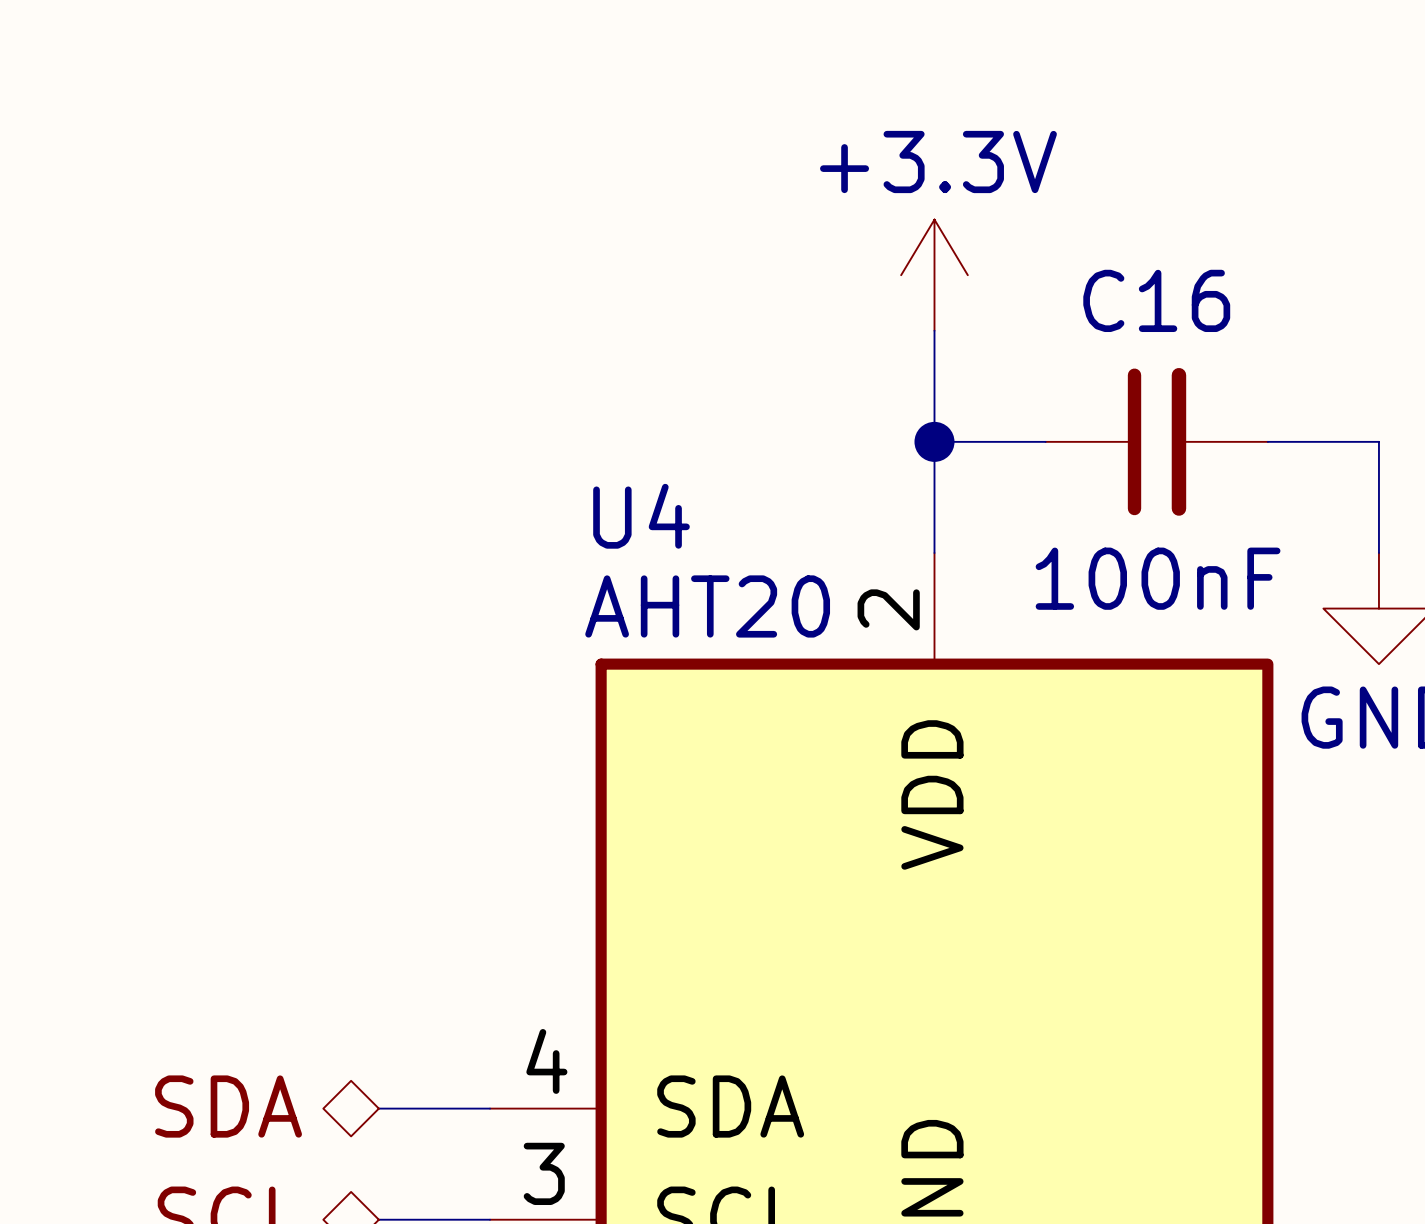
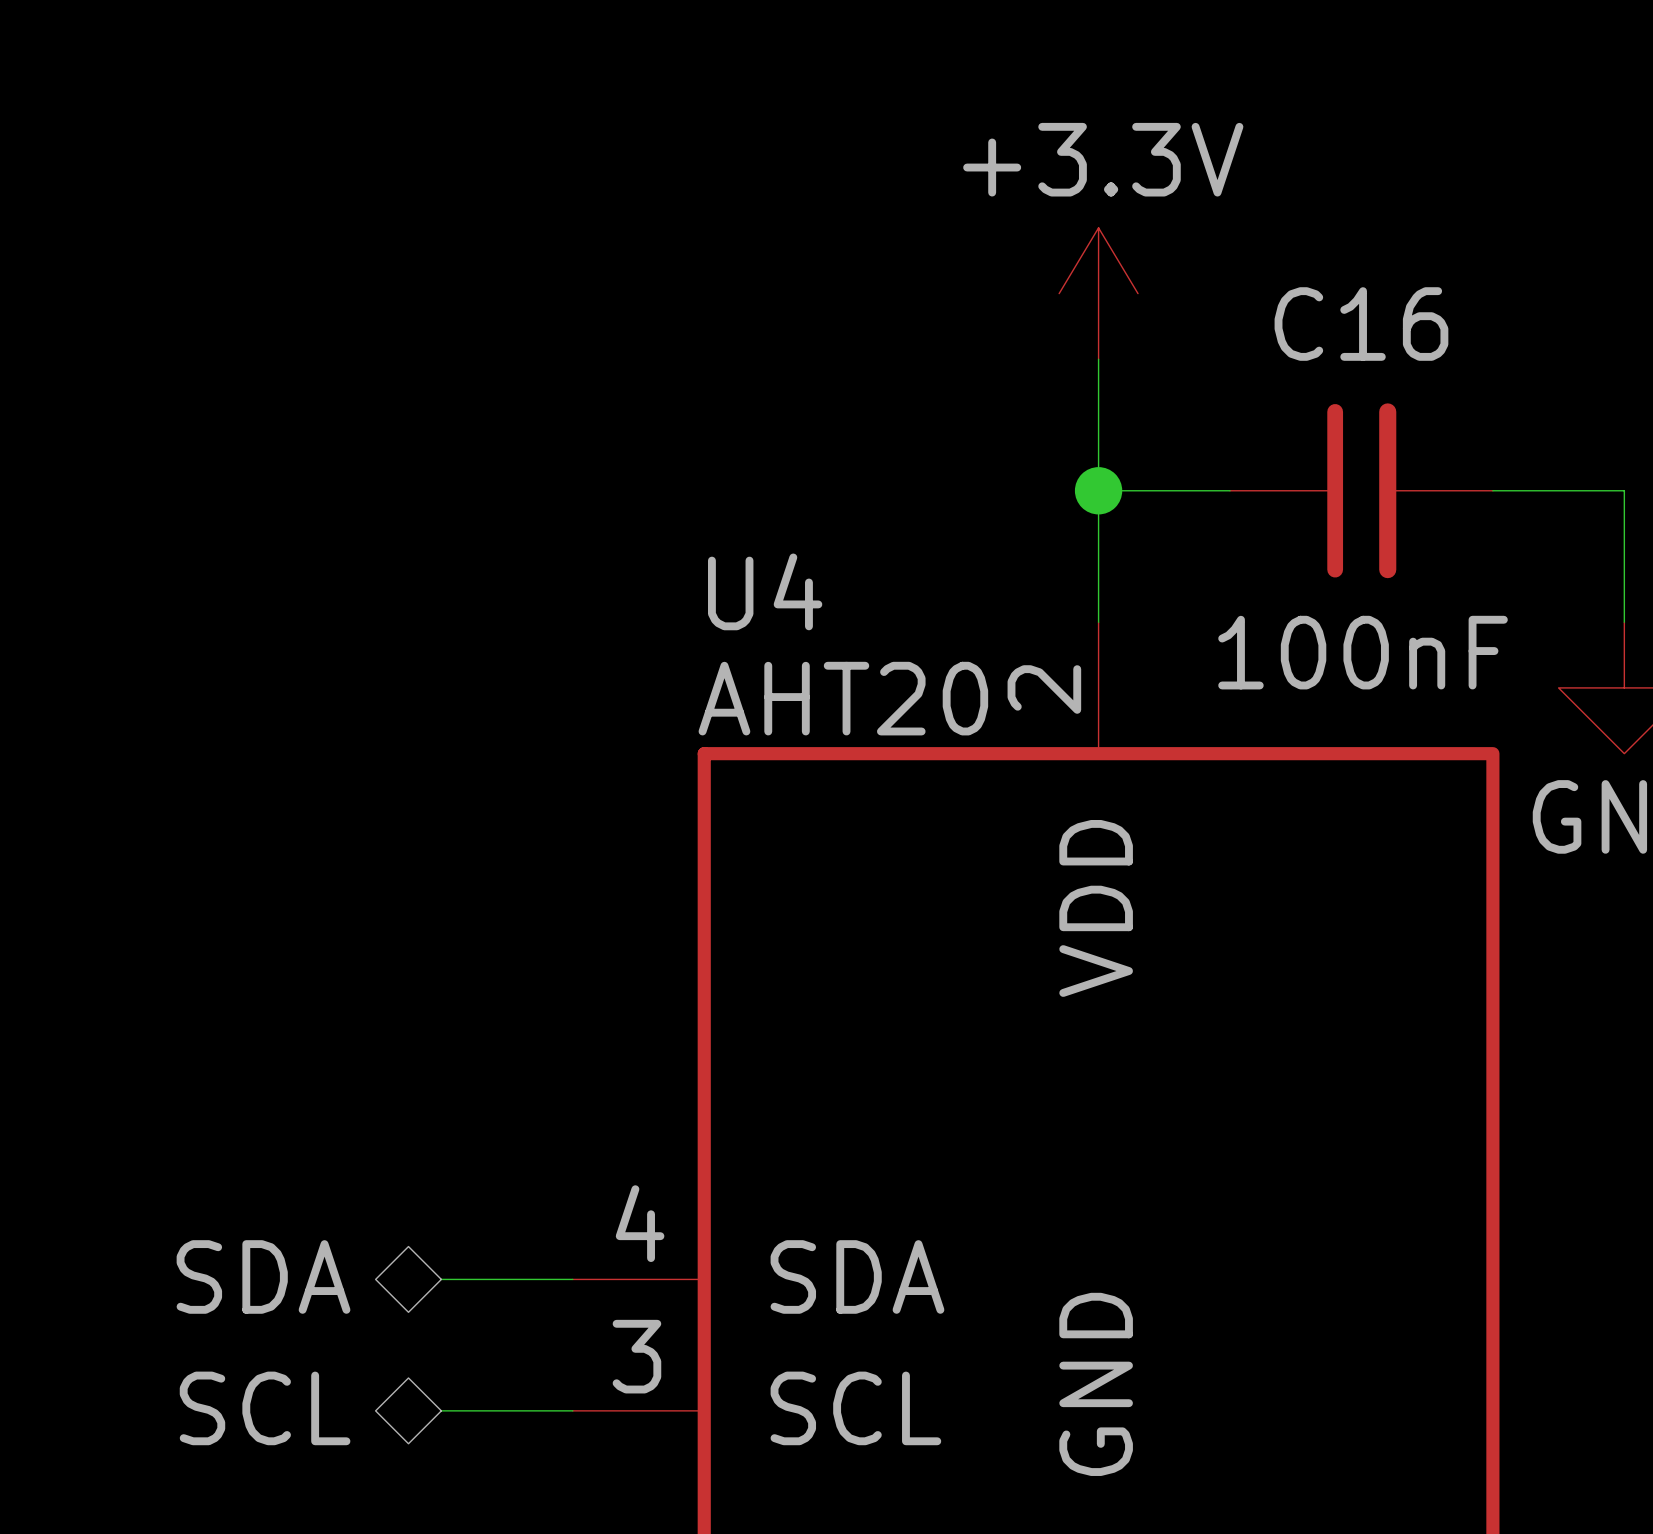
U4 name position: U4 (641, 516) -> U4 (765, 591)
U4 value position: AHT20 (707, 606) -> AHT20 (843, 698)

